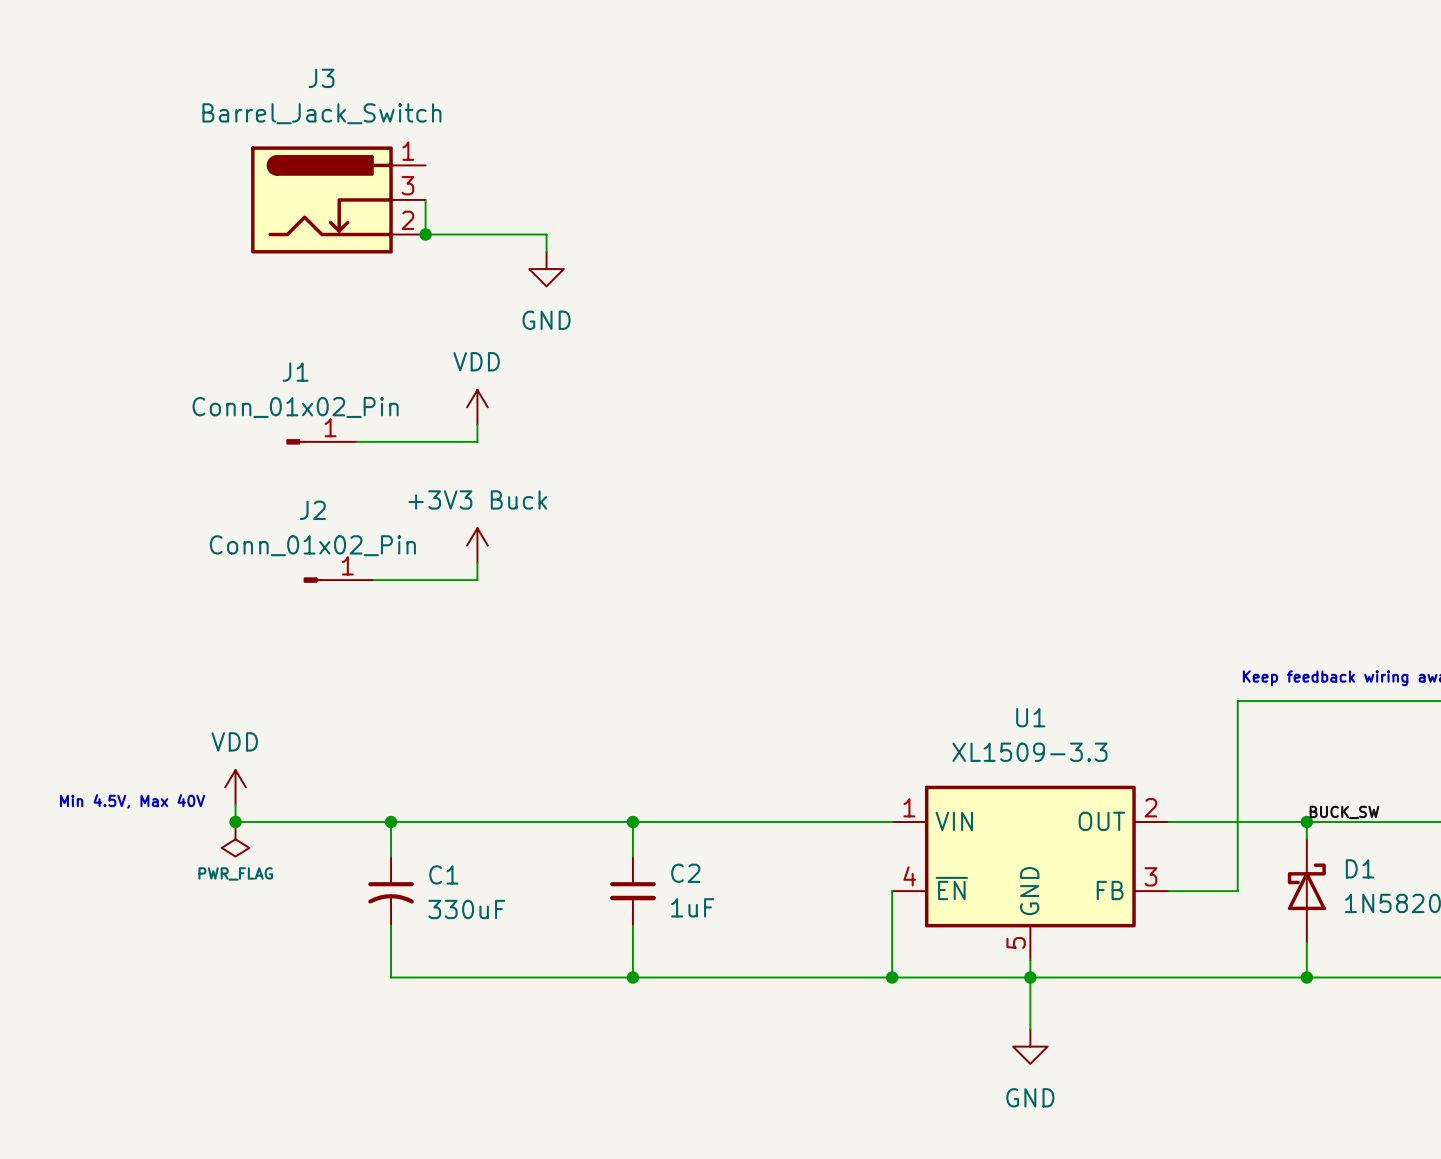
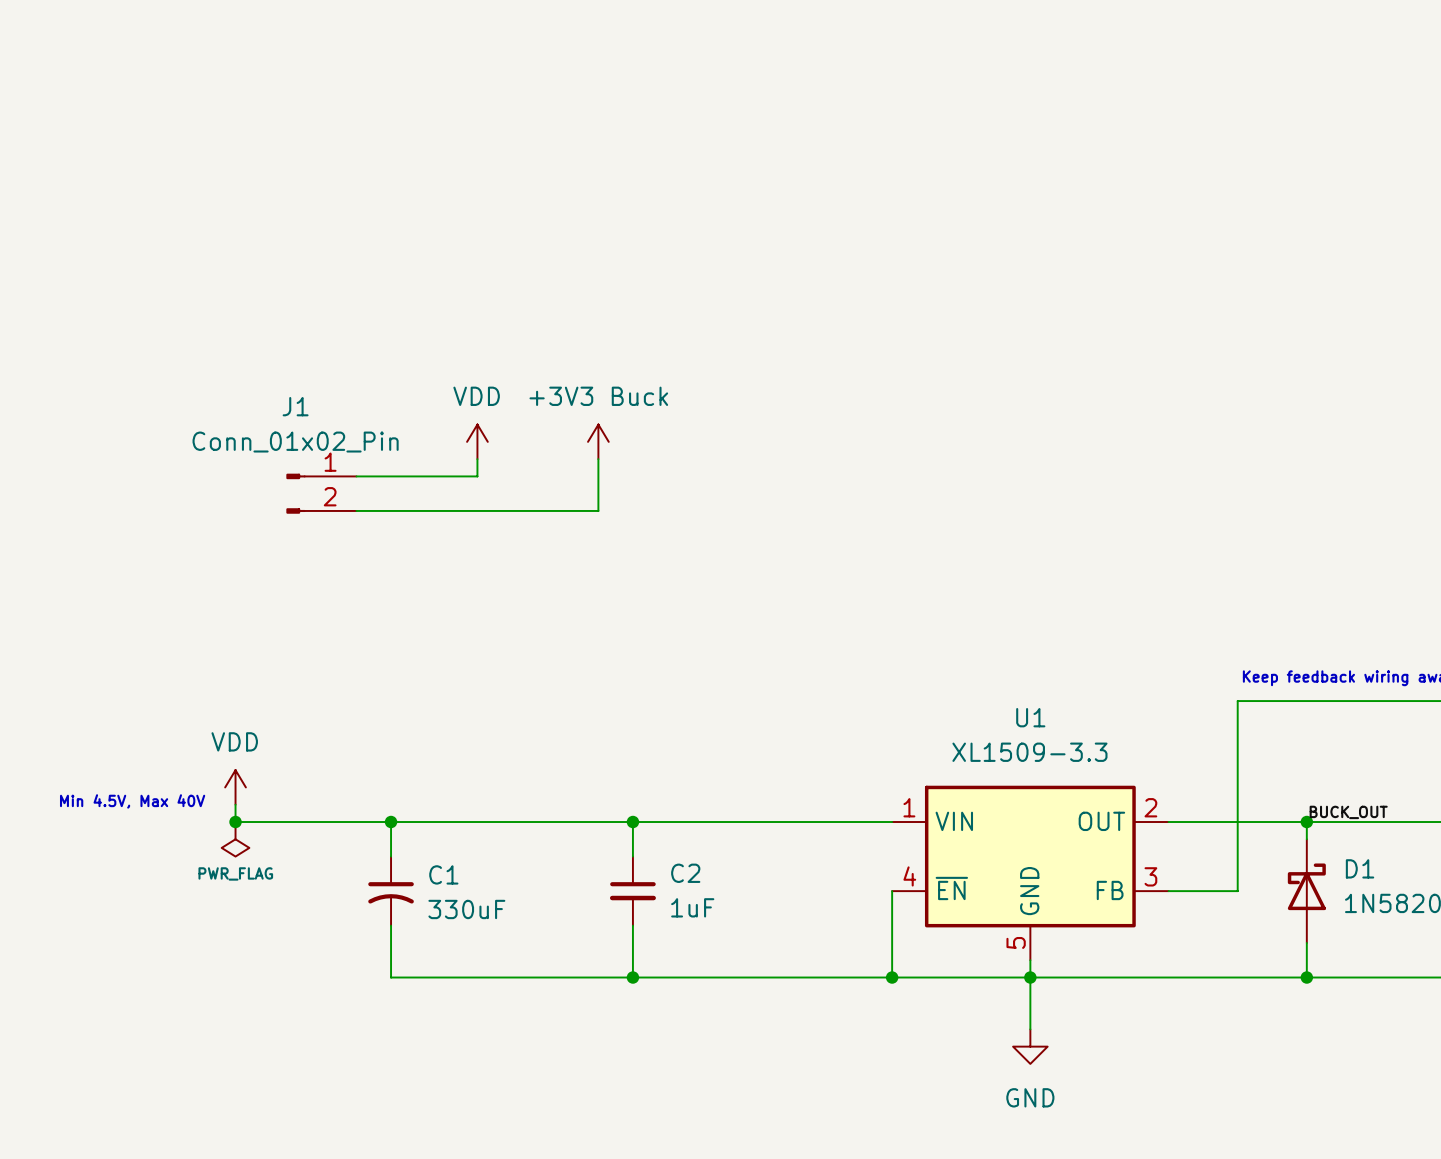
J3: Barrel_Jack_Switch (338, 199) -> none
wire: (425, 199) (425, 234) (546, 234) (546, 251) -> none
junction: (425, 234) -> none
power symbol: GND (546, 269) -> none
power symbol position: VDD (477, 407) -> VDD (477, 441)
wire: (477, 424) (477, 441) (356, 441) -> (477, 459) (477, 476) (356, 476)
J1 symbol: [286, 439, 357, 445] -> [286, 473, 357, 514]
wire: none -> (598, 459) (598, 510) (356, 510)
power symbol position: +3V3 Buck (477, 545) -> +3V3 Buck (598, 441)
wire: (477, 562) (477, 580) (373, 580) -> none
J2: Conn_01x02_Pin (338, 580) -> none
label: BUCK_SW (1344, 812) -> BUCK_OUT (1348, 812)

